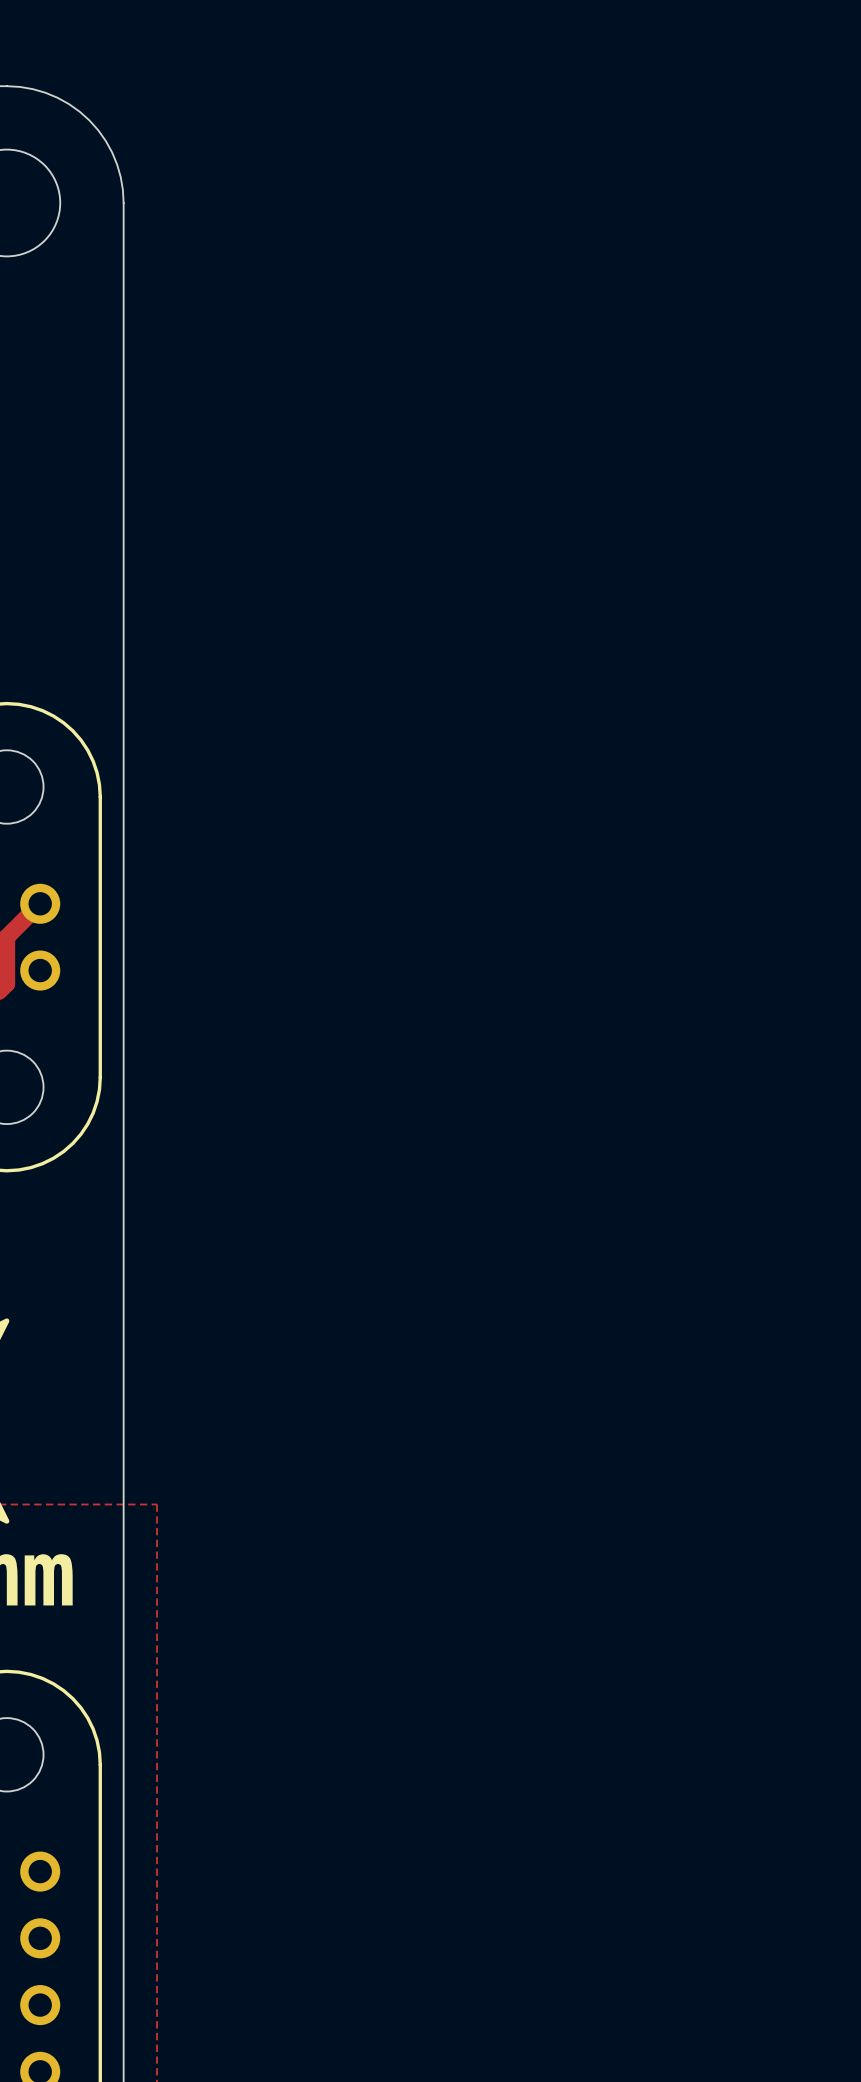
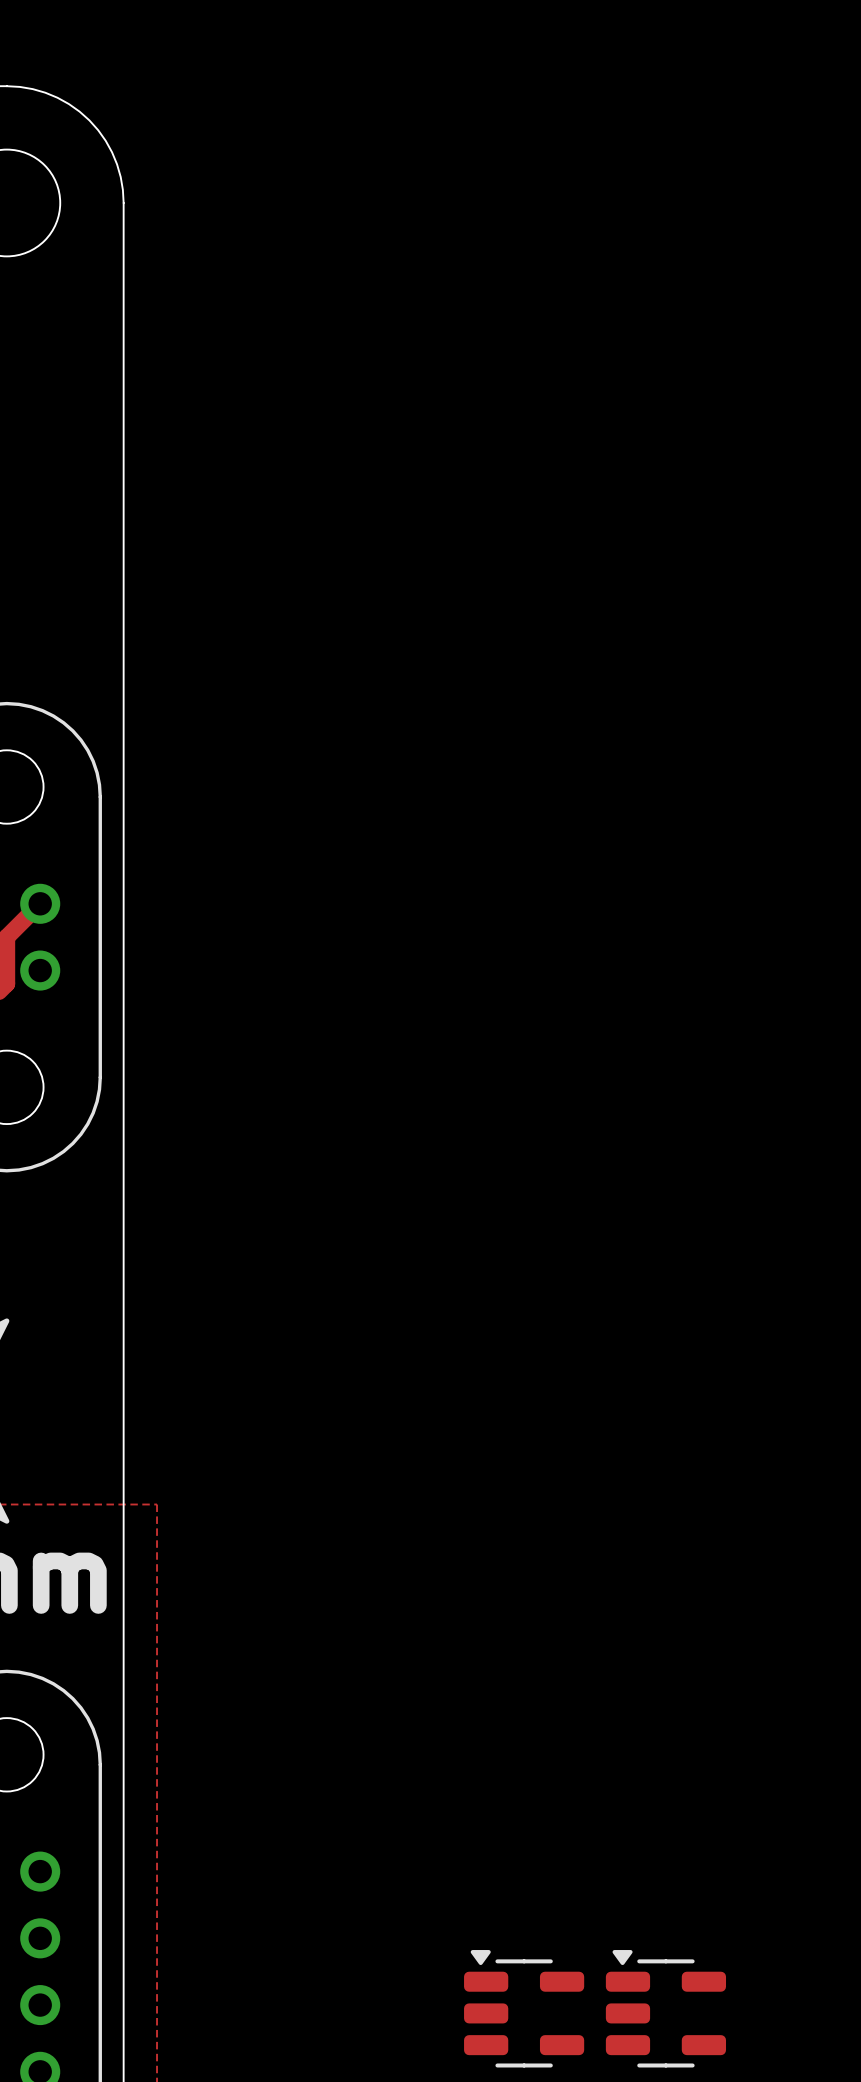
part: none -> (524, 2008)
part: none -> (665, 2008)

